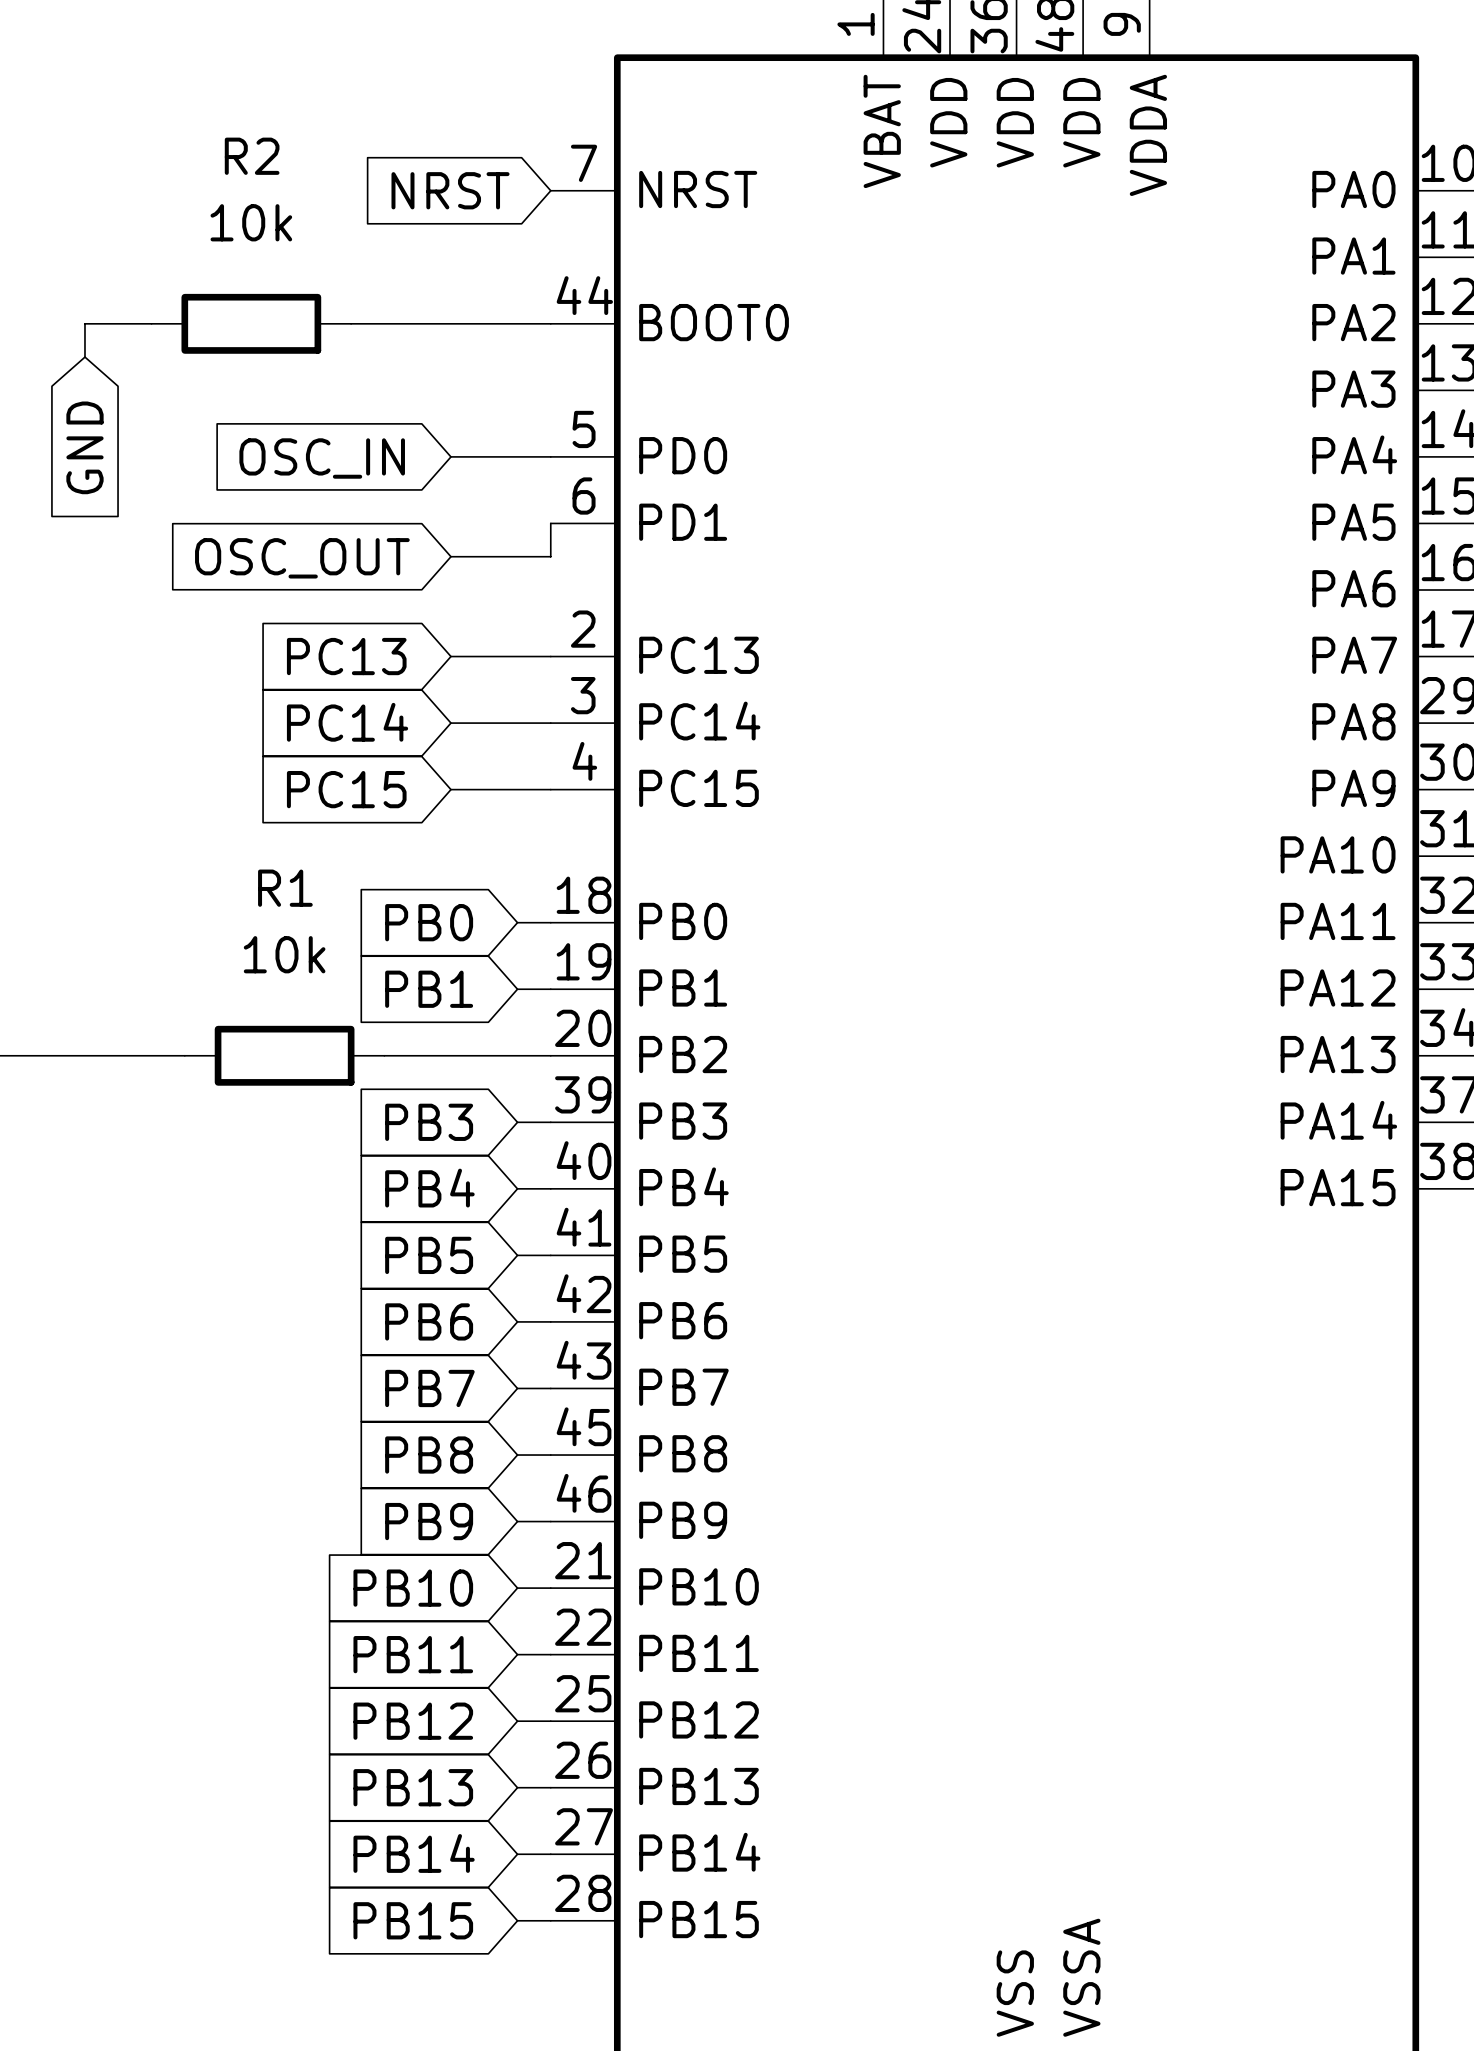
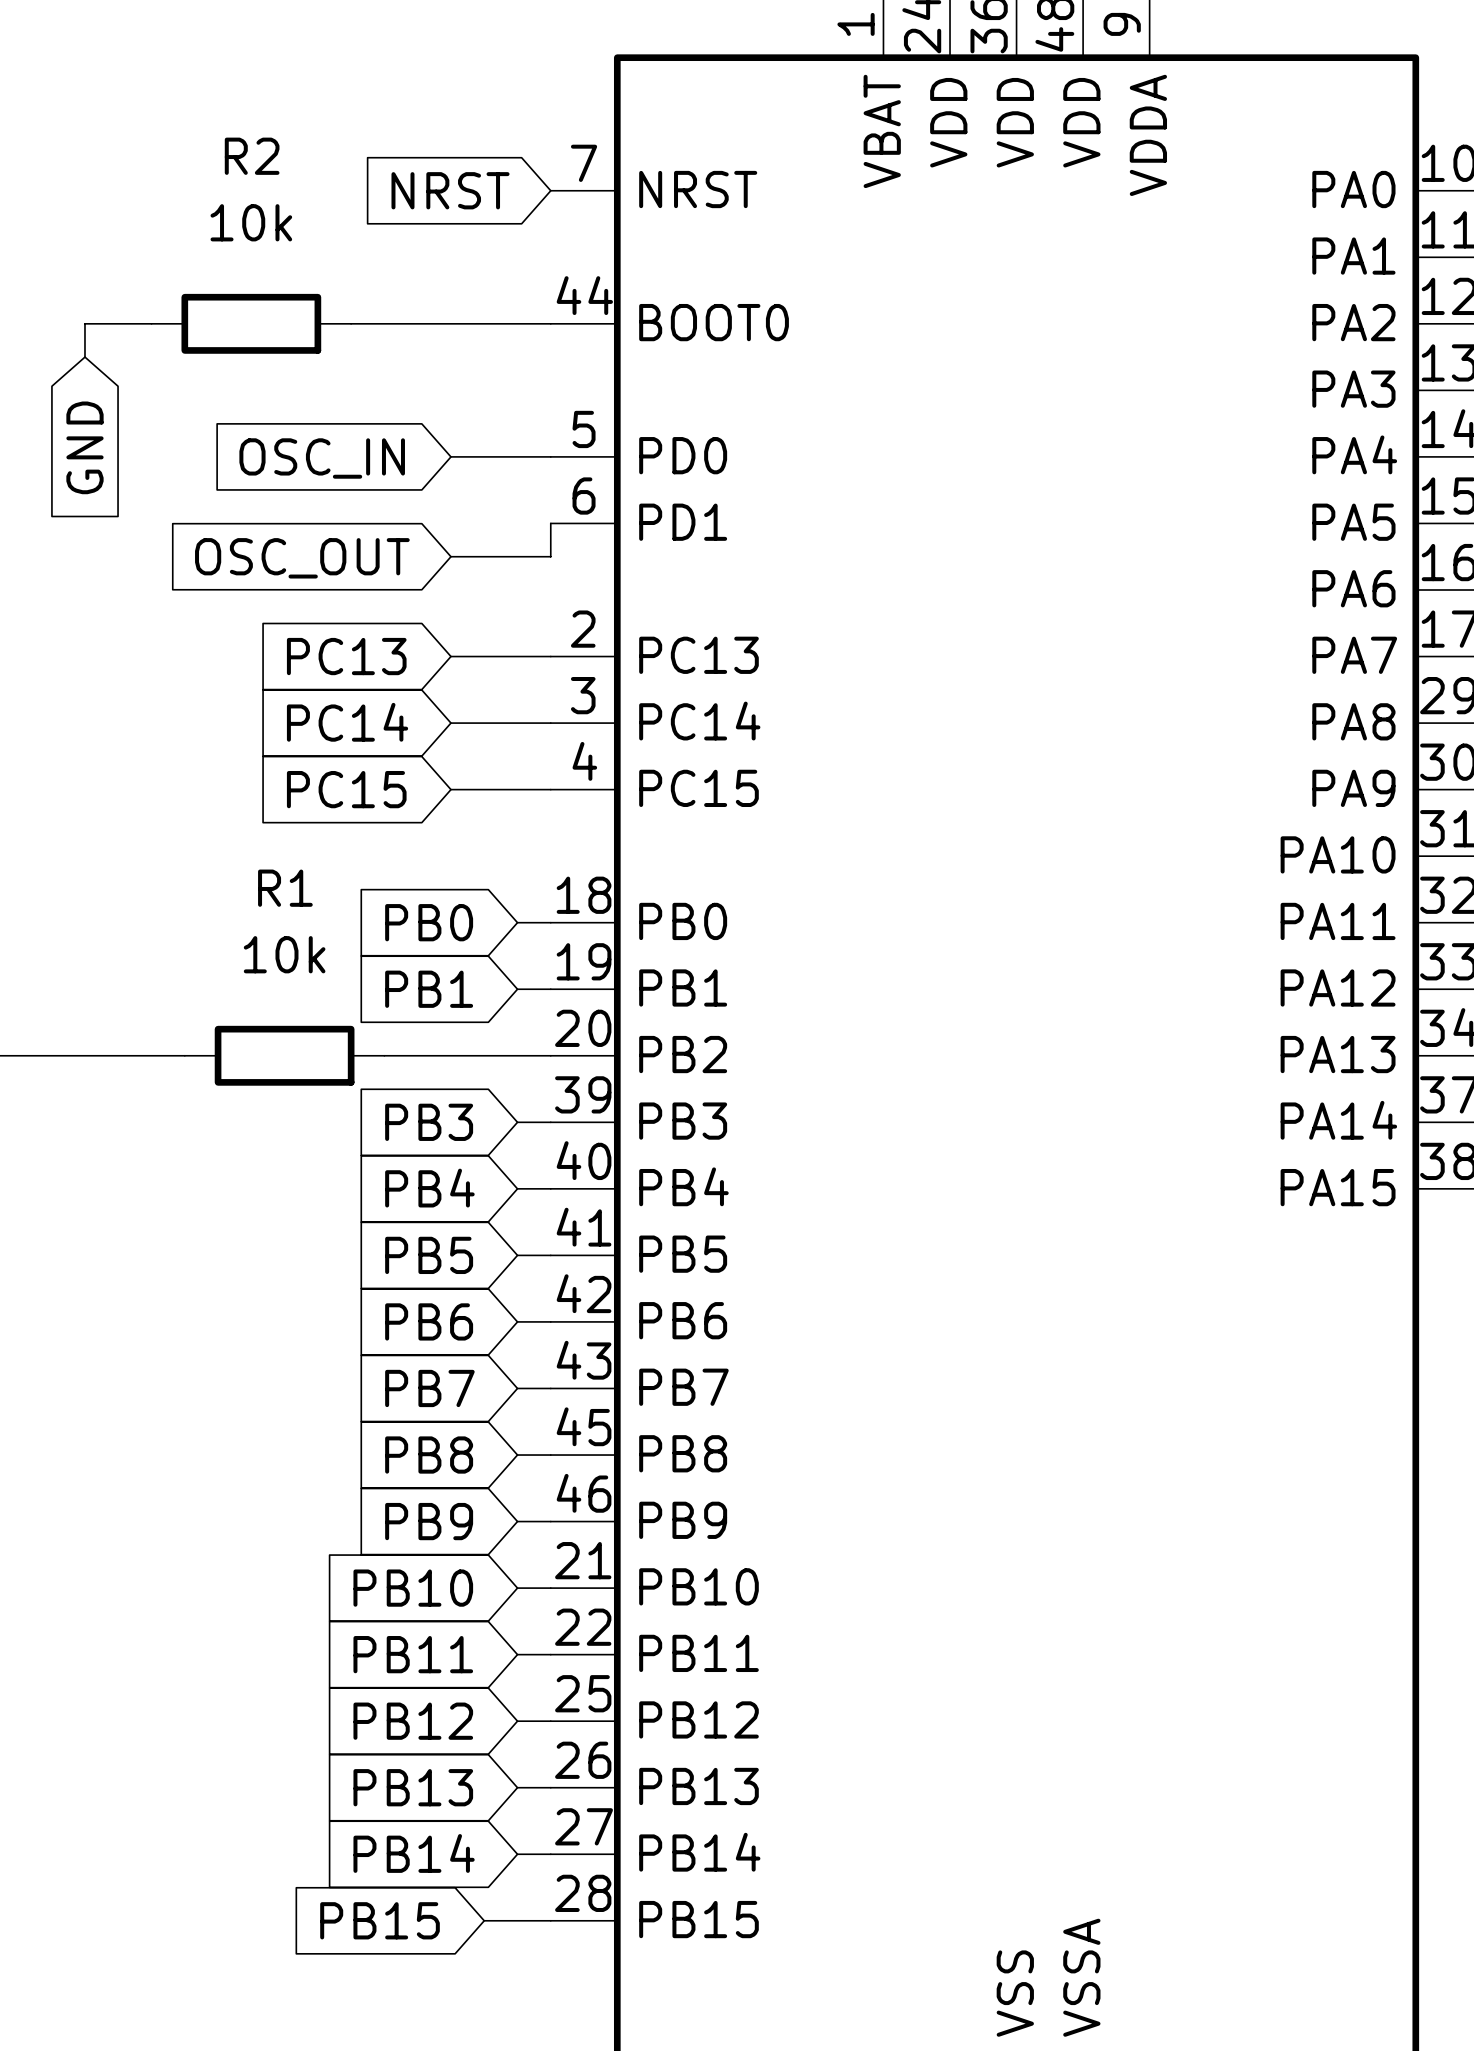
global label position: PB15 (413, 1920) -> PB15 (380, 1920)
wire: none -> (484, 1920) (517, 1920)

